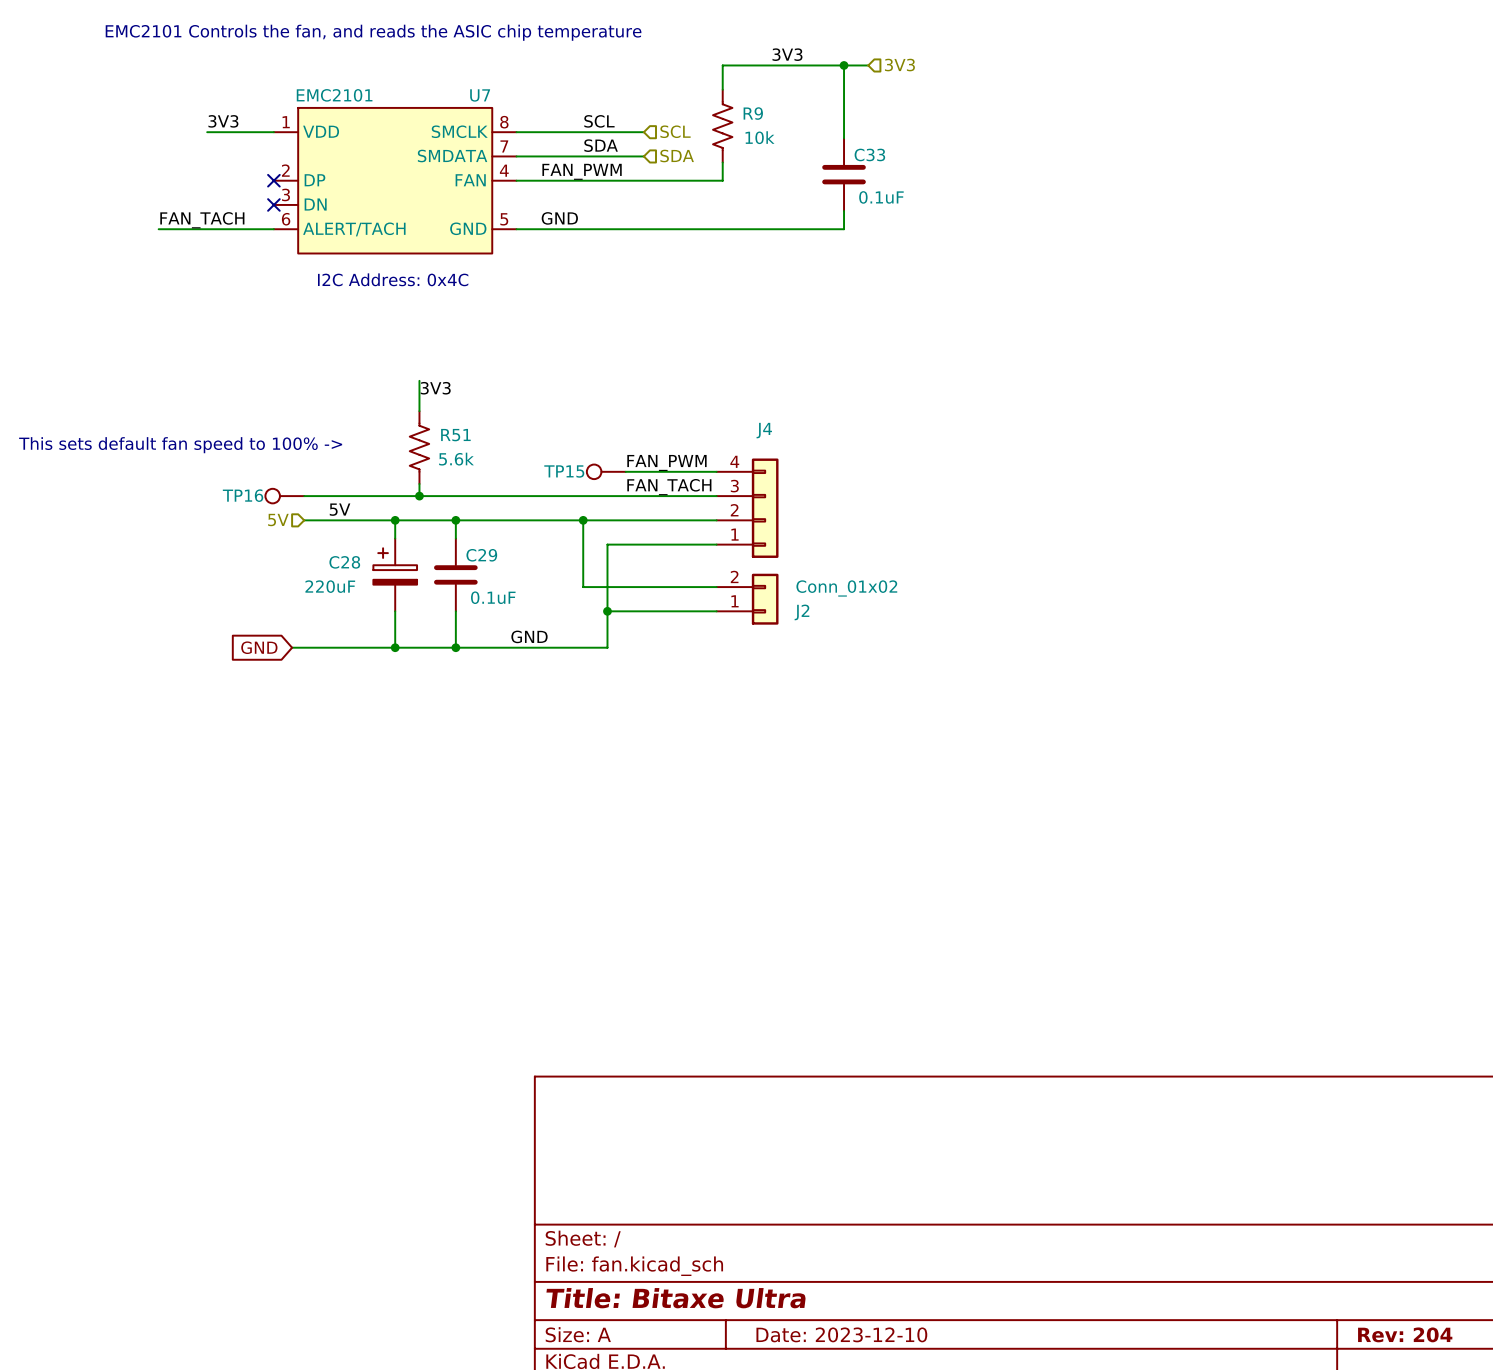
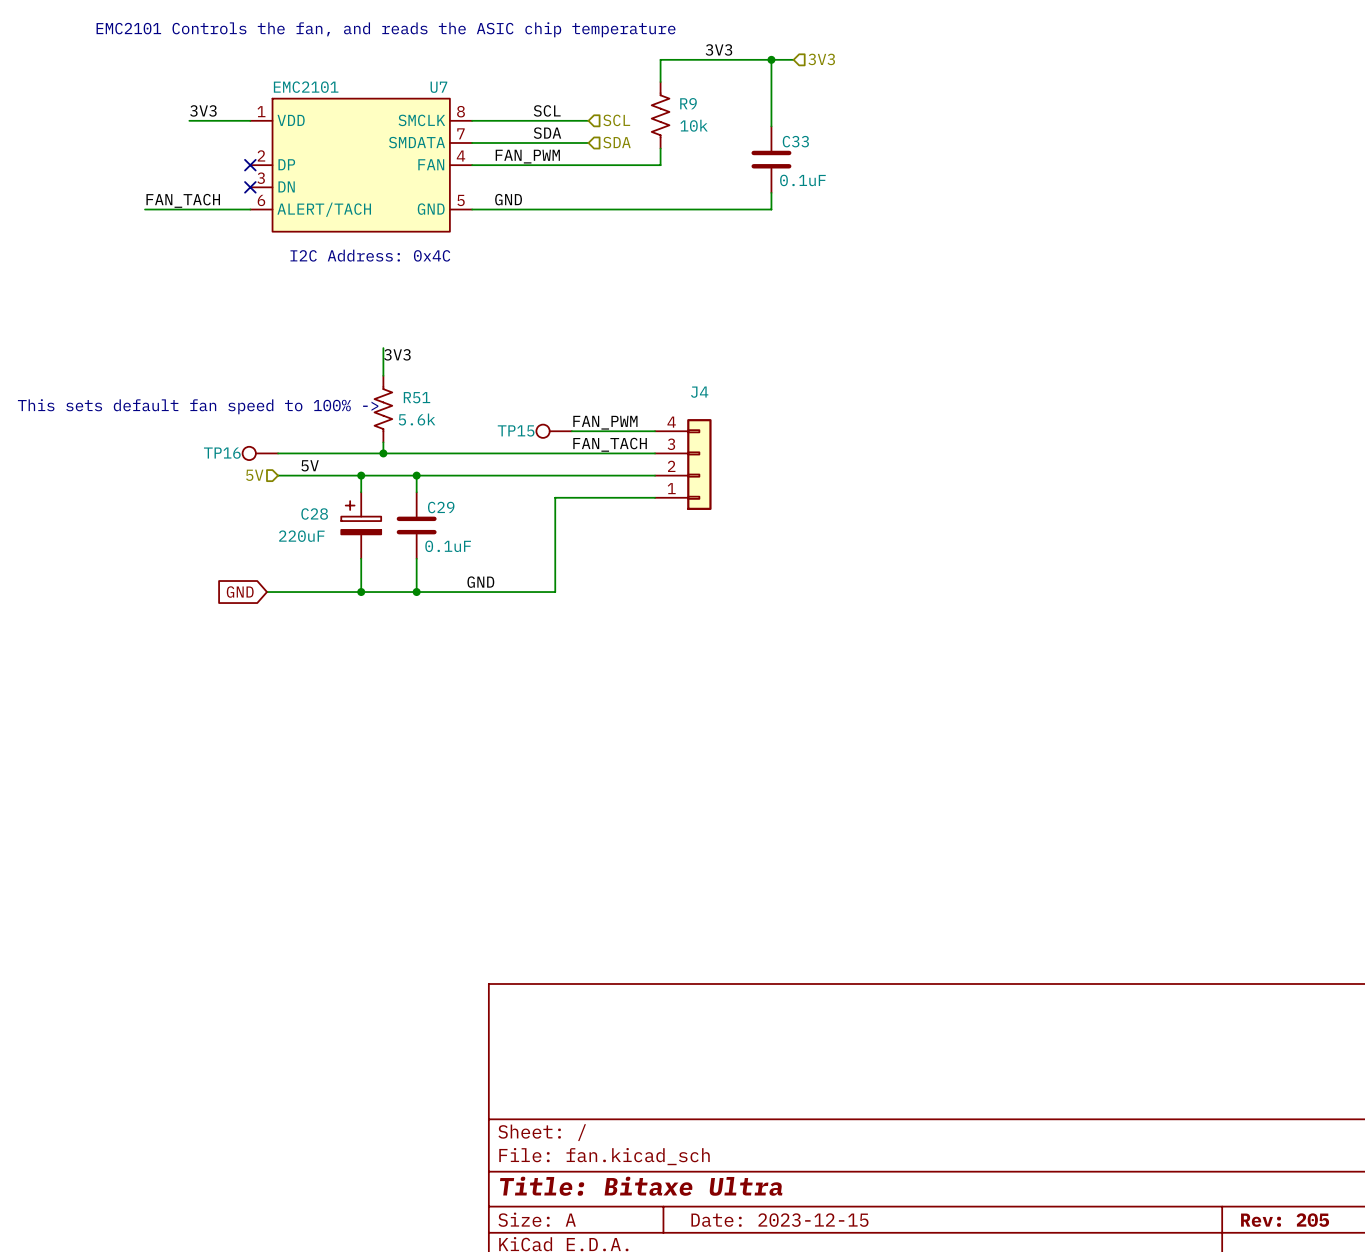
wire: (583, 520) (583, 587) (716, 587) -> none
junction: (583, 520) -> none
J2: Conn_01x02 (747, 599) -> none
wire: (607, 611) (716, 611) -> none
junction: (607, 611) -> none
title block: Date: 2023-12-10 (841, 1334) -> Date: 2023-12-15 (779, 1220)
title block: Rev: 204 (1405, 1334) -> Rev: 205 (1285, 1220)

